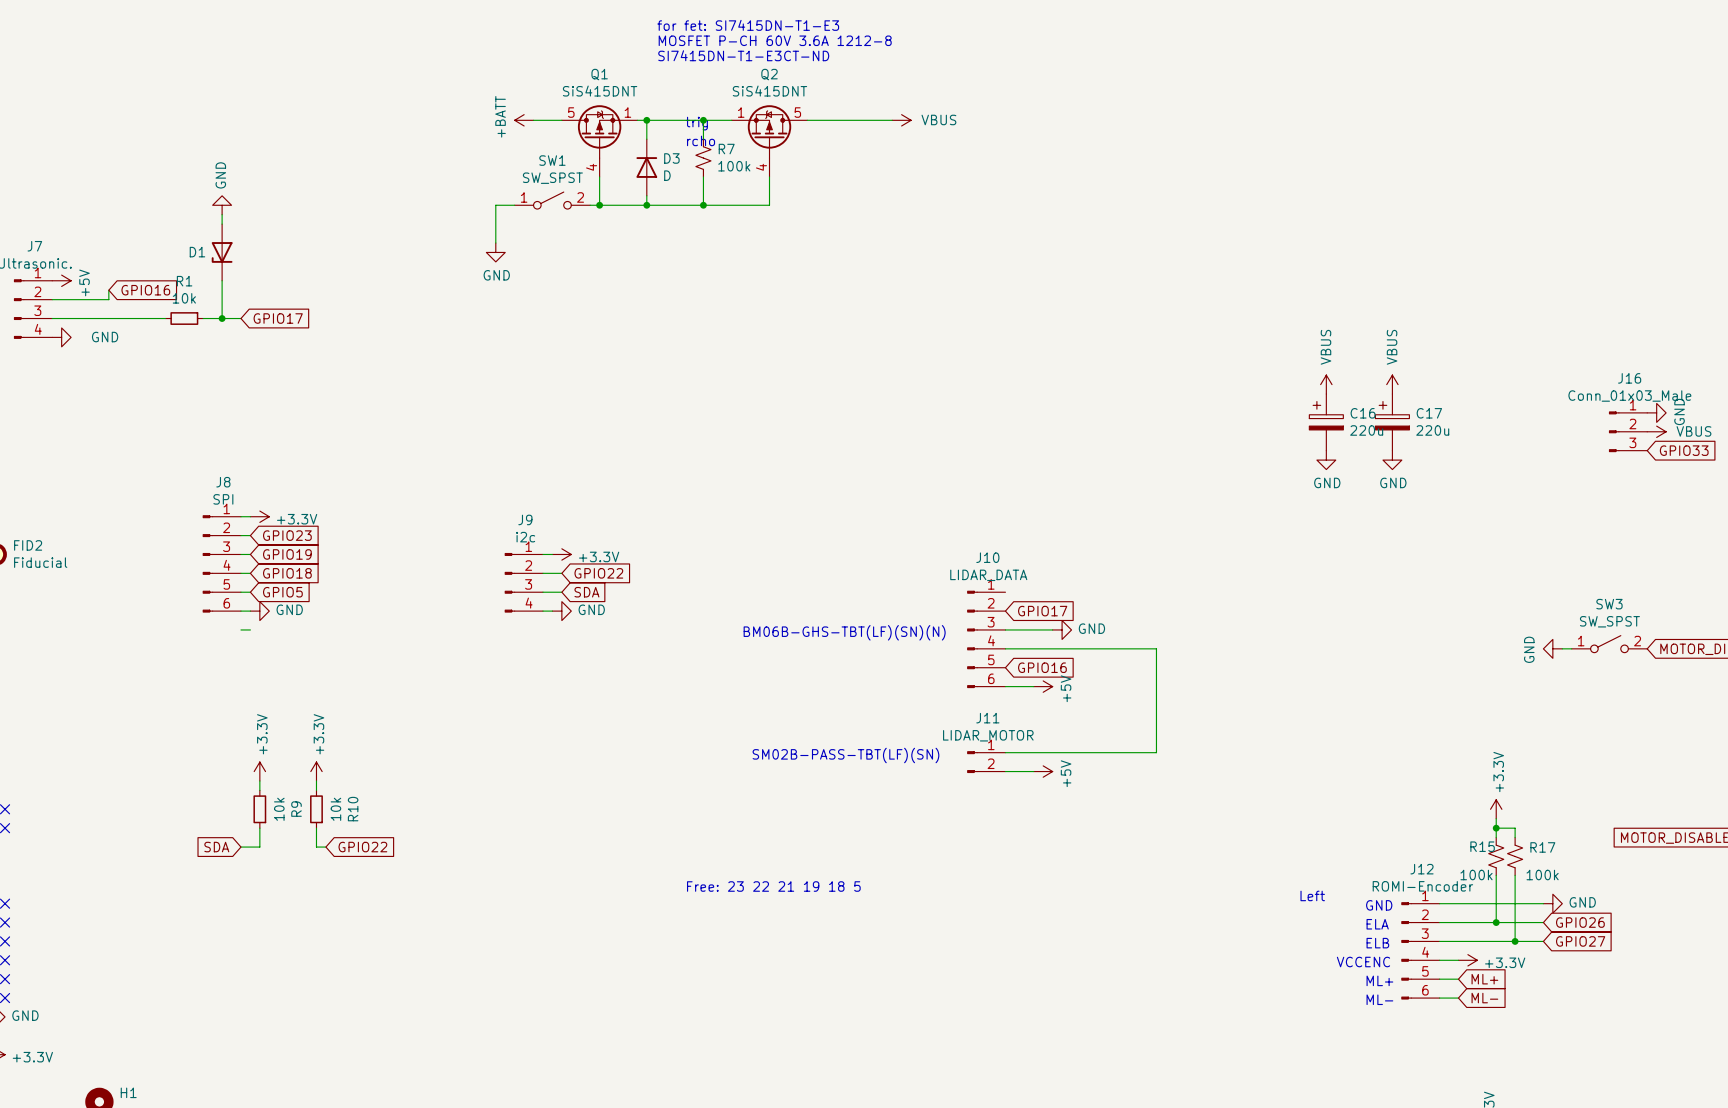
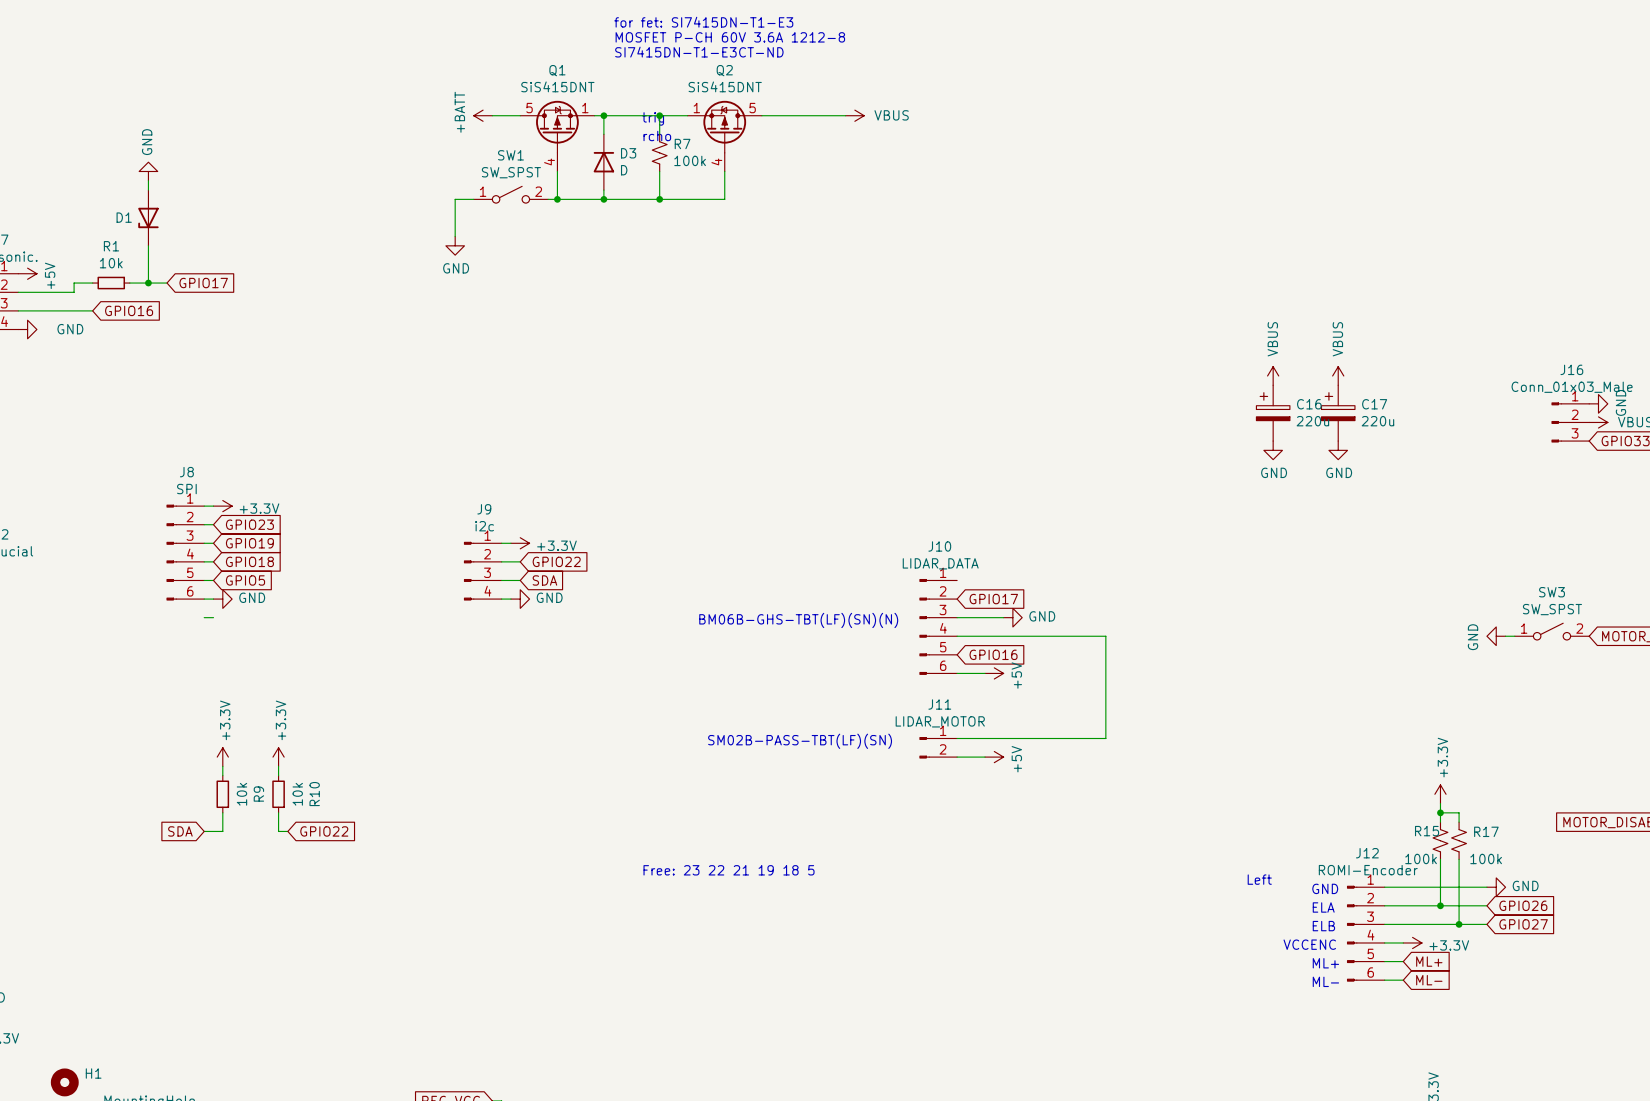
power symbol position: GND (222, 205) -> GND (148, 171)
wire: (222, 214) (222, 224) -> (148, 180) (148, 190)
D1 position: (222, 252) -> (148, 217)
wire: (222, 280) (222, 318) -> (148, 245) (148, 283)
wire: none -> (74, 283) (92, 283)
global label position: GPIO16 (145, 290) -> GPIO16 (129, 310)
junction: none -> (148, 283)
wire: (127, 318) (165, 318) -> (129, 283) (167, 283)
R1 position: (184, 318) -> (111, 283)
wire: (203, 318) (240, 318) -> none
junction: (222, 318) -> none
global label position: GPIO17 (278, 318) -> GPIO17 (203, 283)

